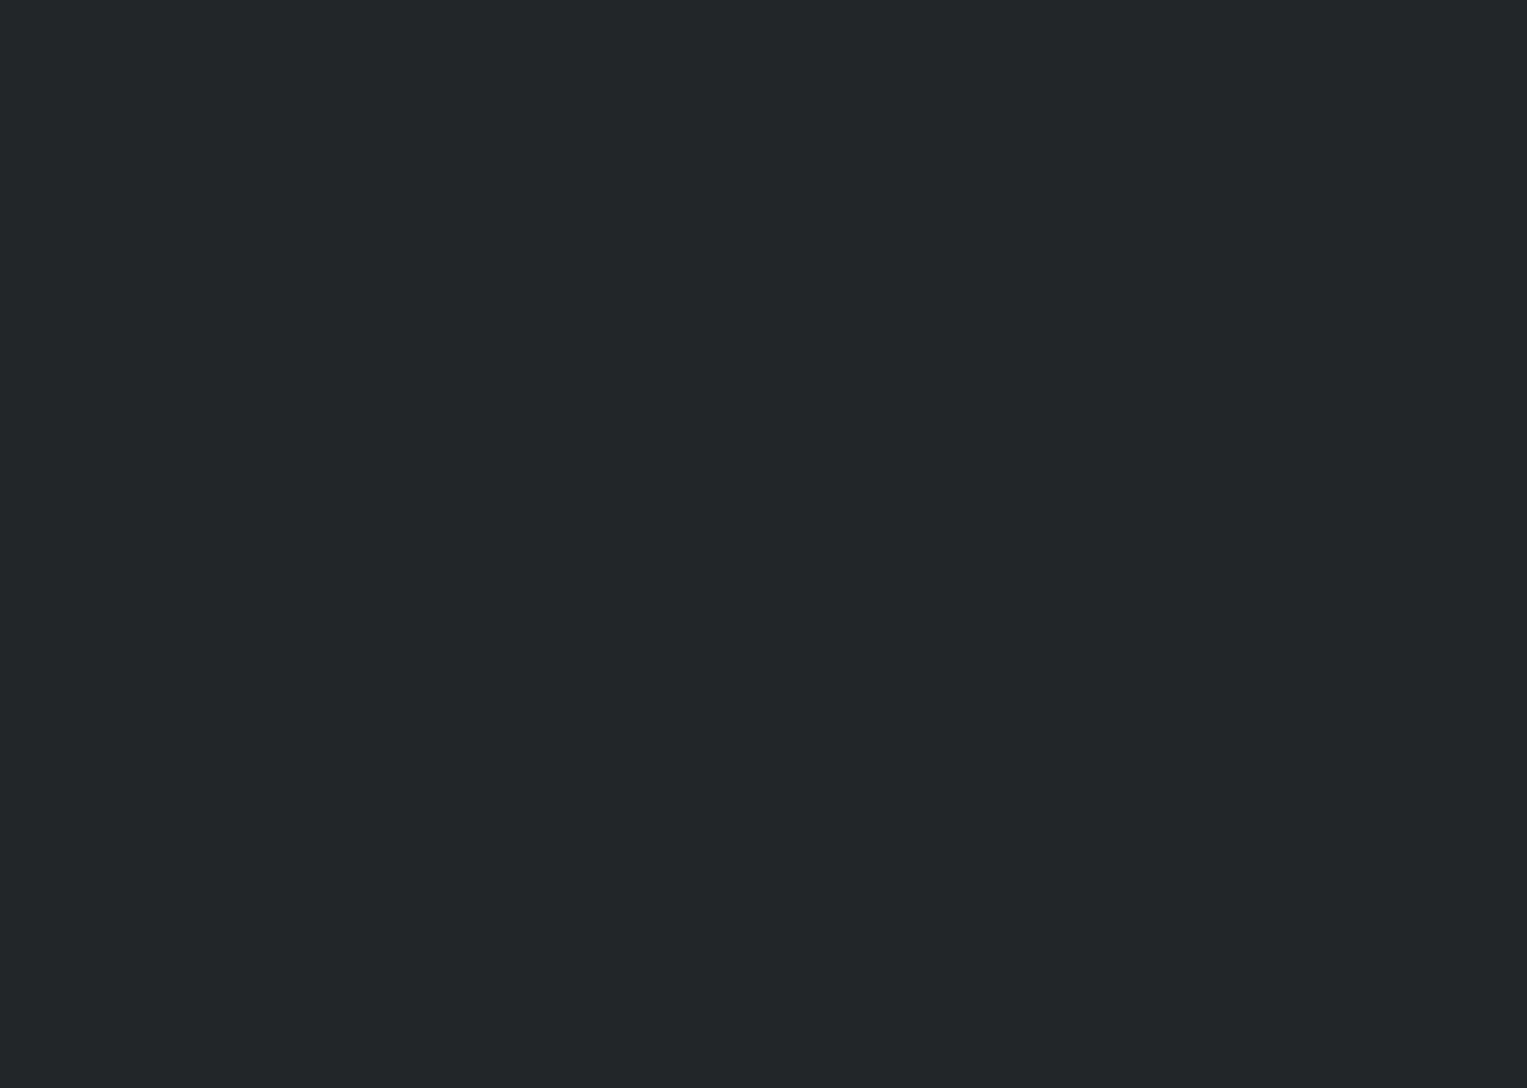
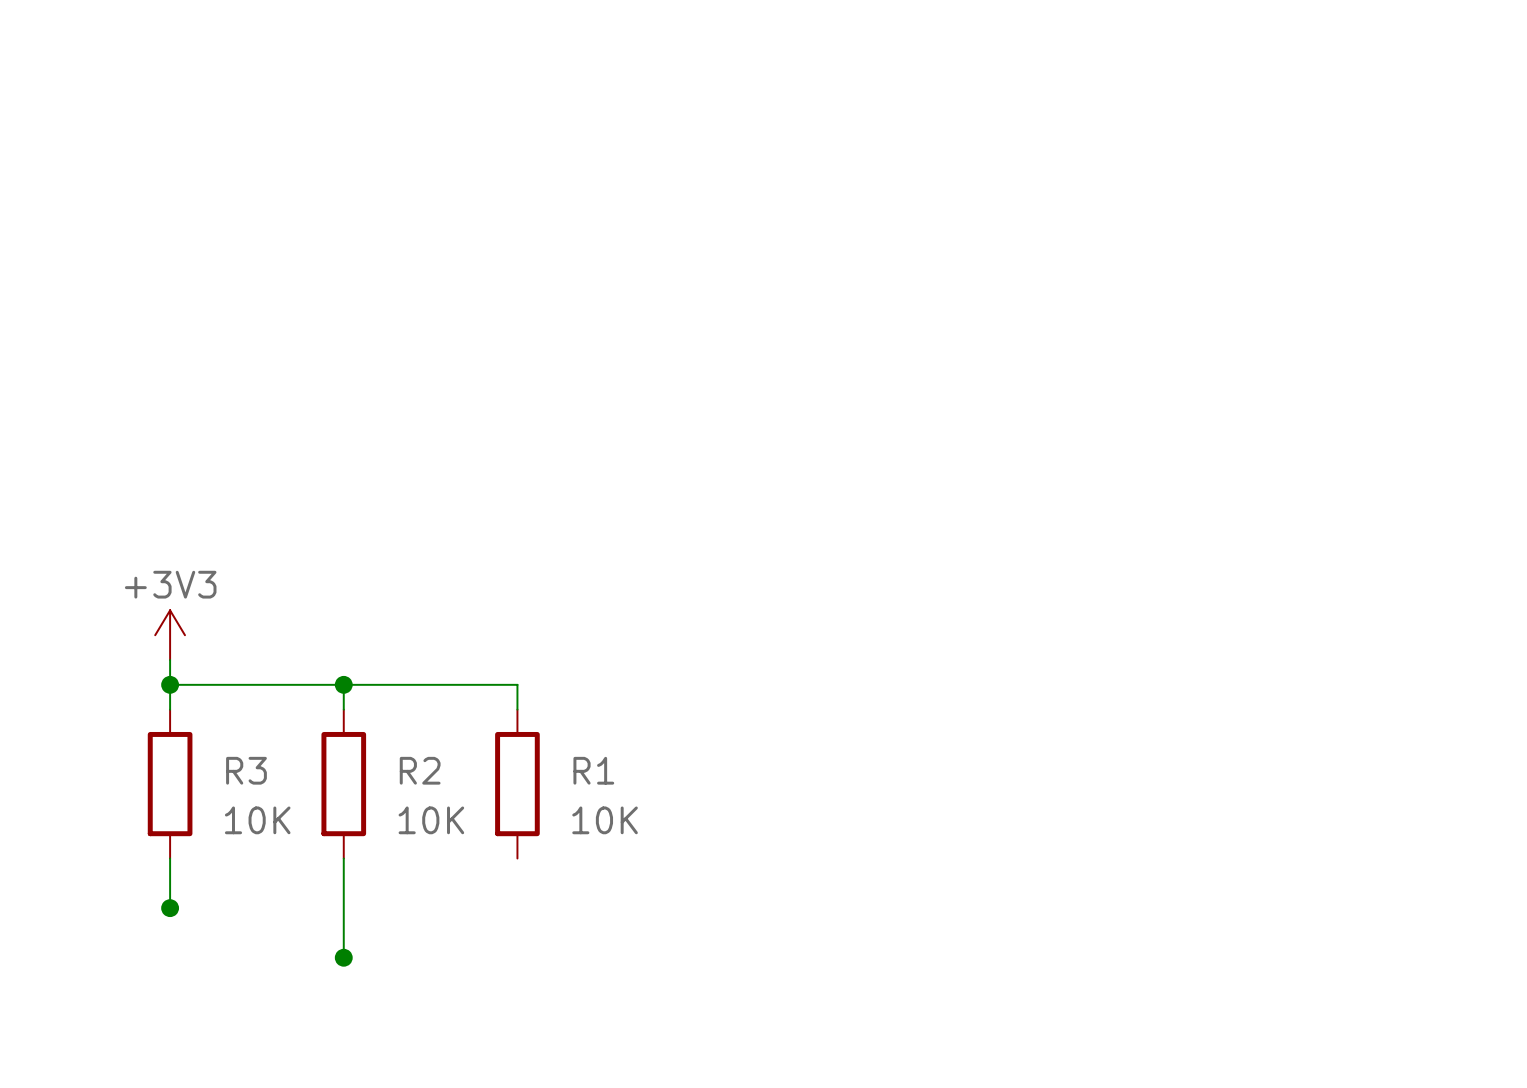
power symbol: none -> +3V3 (170, 635)
wire: none -> (170, 660) (170, 709)
wire: none -> (170, 684) (517, 684) (517, 709)
junction: none -> (170, 684)
wire: none -> (343, 684) (343, 709)
junction: none -> (343, 684)
R3: none -> 10K (170, 784)
R2: none -> 10K (343, 784)
R1: none -> 10K (517, 784)
wire: none -> (170, 858) (170, 908)
wire: none -> (343, 858) (343, 957)
junction: none -> (170, 908)
junction: none -> (343, 957)

